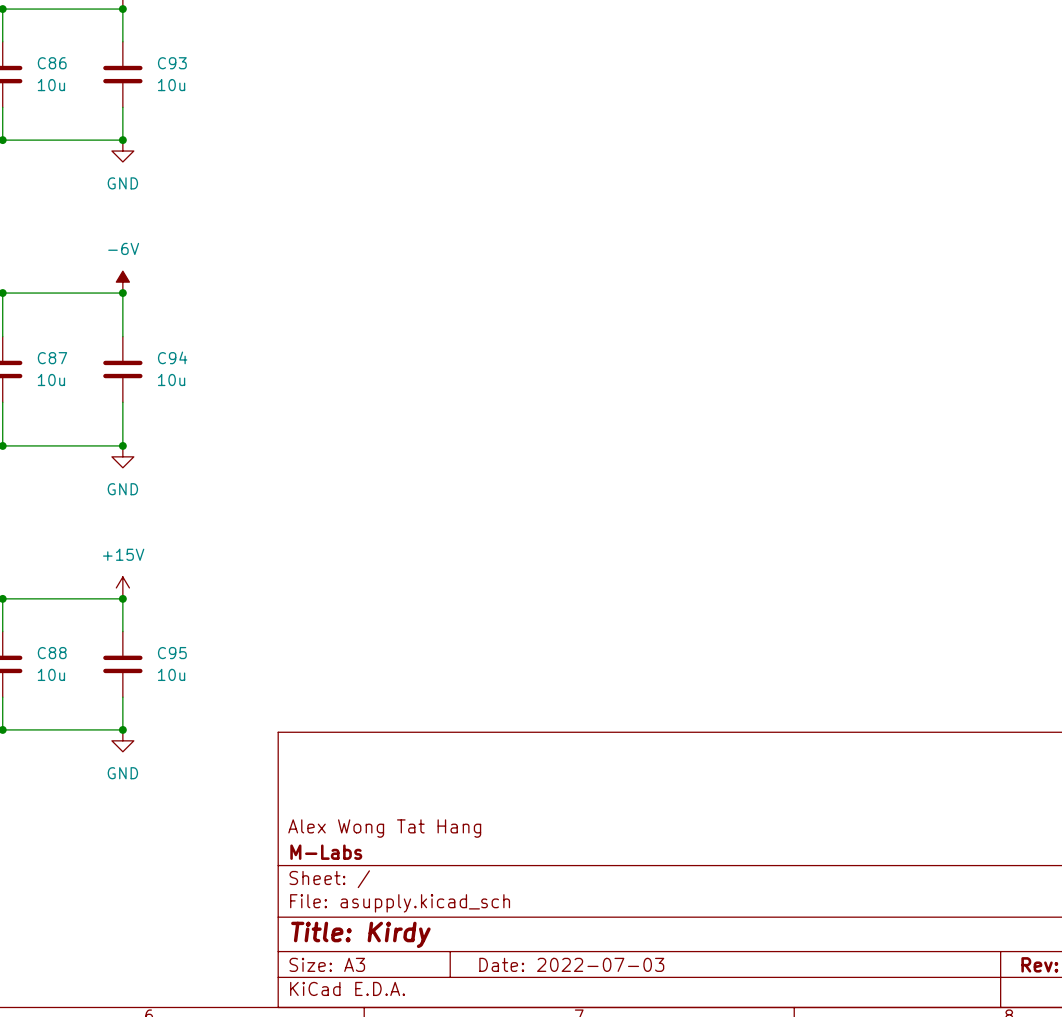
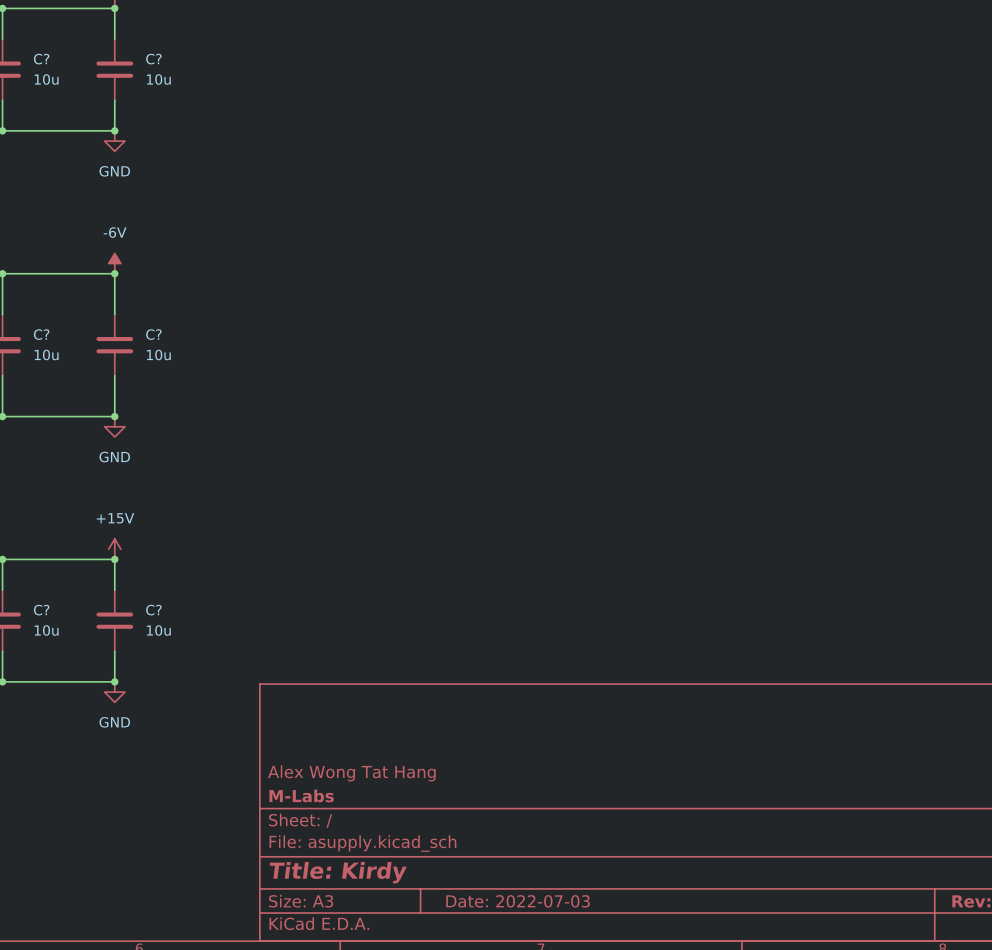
C86 name: C86 (52, 63) -> C? (41, 59)
C93 name: C93 (172, 63) -> C? (153, 59)
C94 name: C94 (172, 357) -> C? (153, 334)
C87 name: C87 (52, 358) -> C? (41, 334)
C88 name: C88 (52, 653) -> C? (41, 610)
C95 name: C95 (172, 653) -> C? (153, 610)

